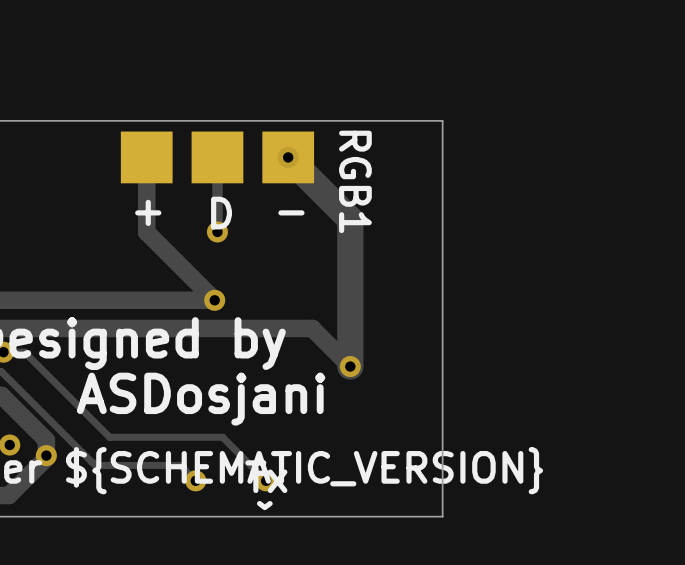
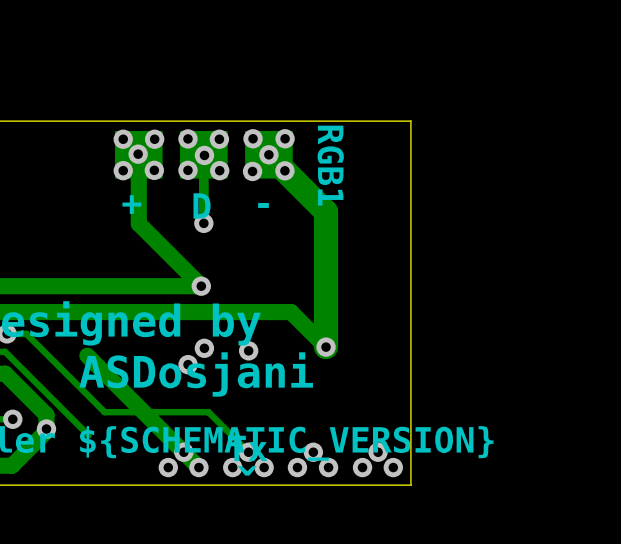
via: none -> (123, 139)
via: none -> (154, 139)
via: none -> (187, 138)
via: none -> (219, 139)
via: none -> (253, 138)
via: none -> (285, 138)
via: none -> (138, 154)
via: none -> (204, 155)
via: none -> (123, 170)
via: none -> (154, 170)
via: none -> (187, 170)
via: none -> (219, 170)
via: none -> (284, 170)
via: none -> (252, 171)
via: none -> (204, 348)
via: none -> (248, 350)
track: none -> (87, 355) (198, 467)
via: none -> (188, 364)
track: (92, 462) (95, 465) (180, 465) (195, 480) -> none
via: none -> (313, 452)
via: none -> (378, 452)
via: none -> (168, 467)
via: none -> (198, 467)
via: none -> (232, 467)
via: none -> (264, 467)
via: none -> (297, 467)
via: none -> (328, 467)
via: none -> (362, 467)
via: none -> (393, 467)

